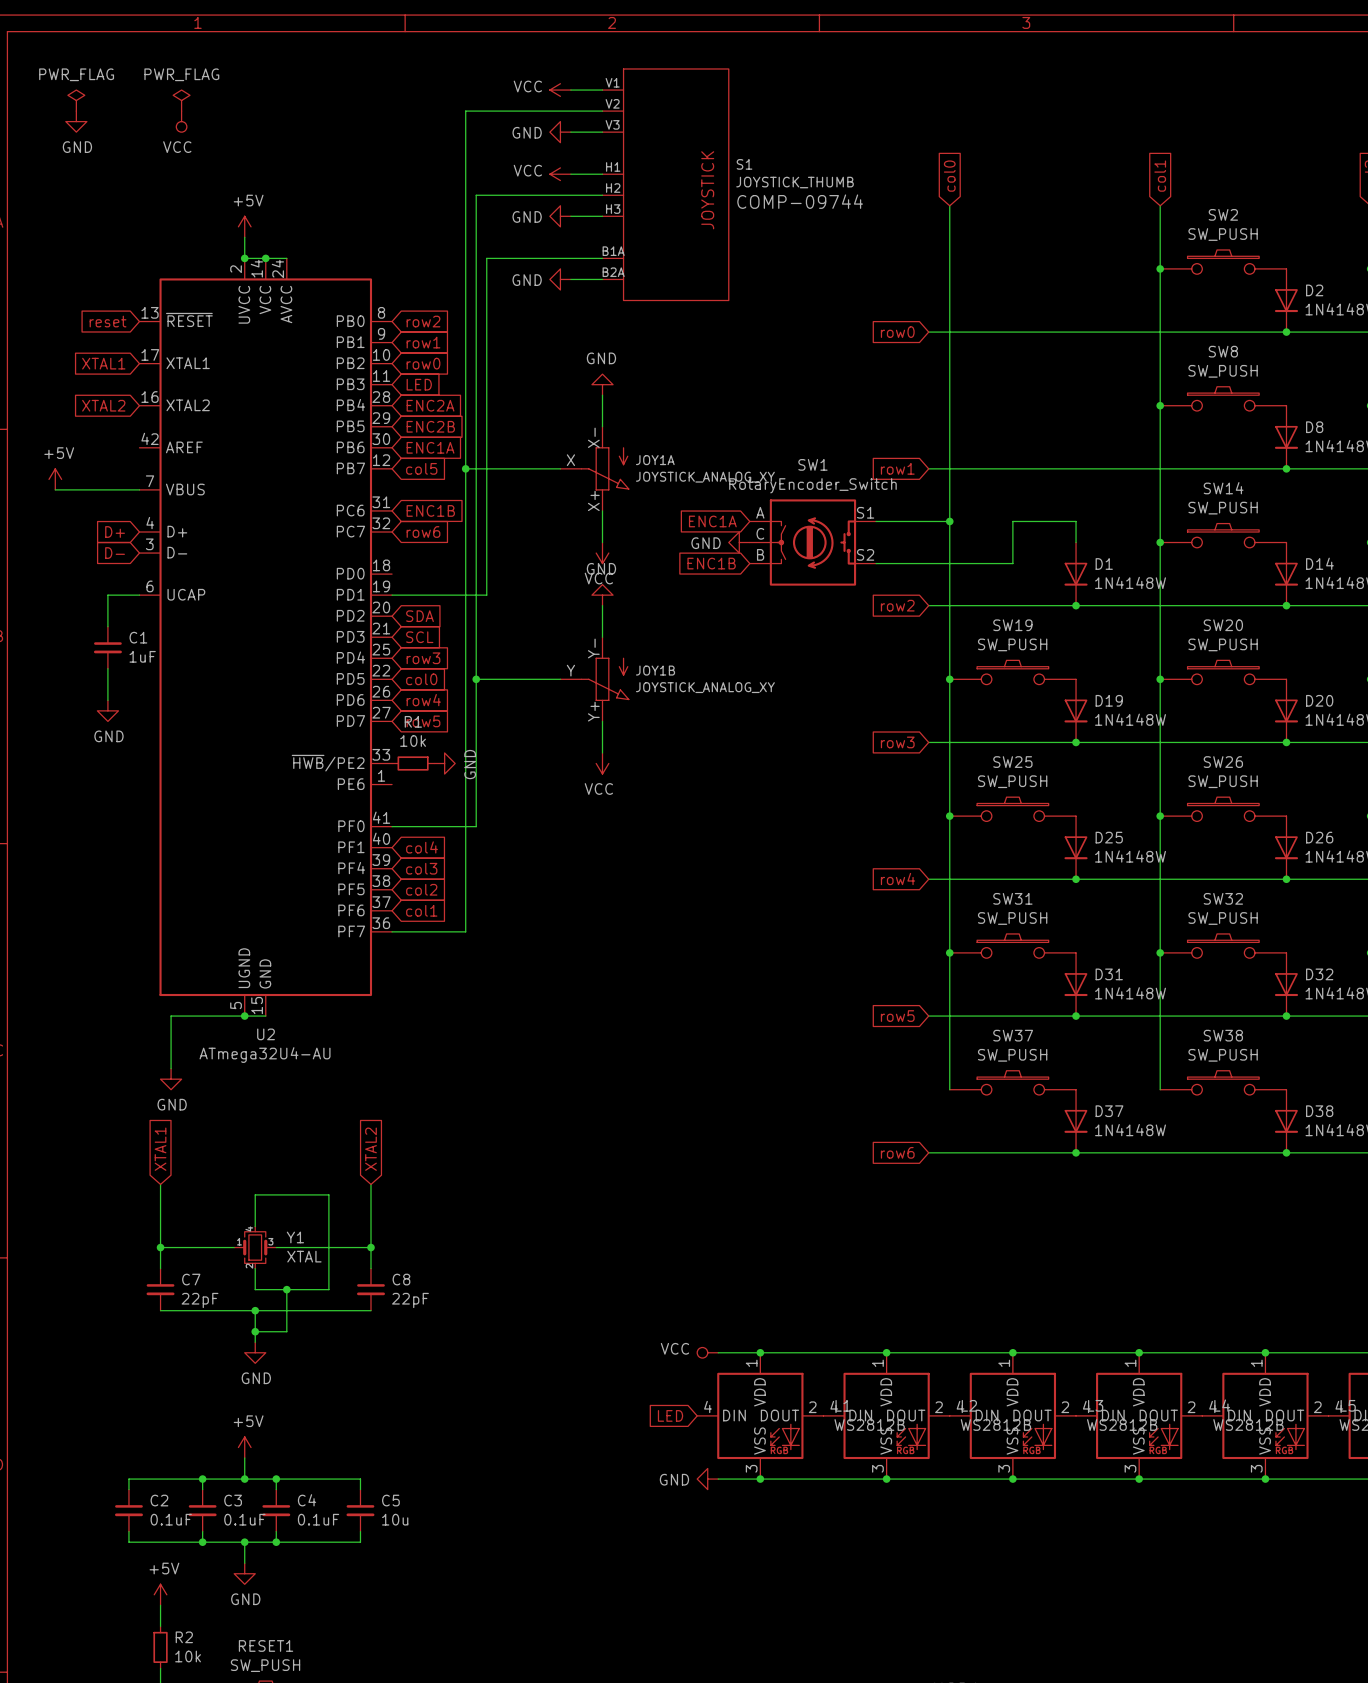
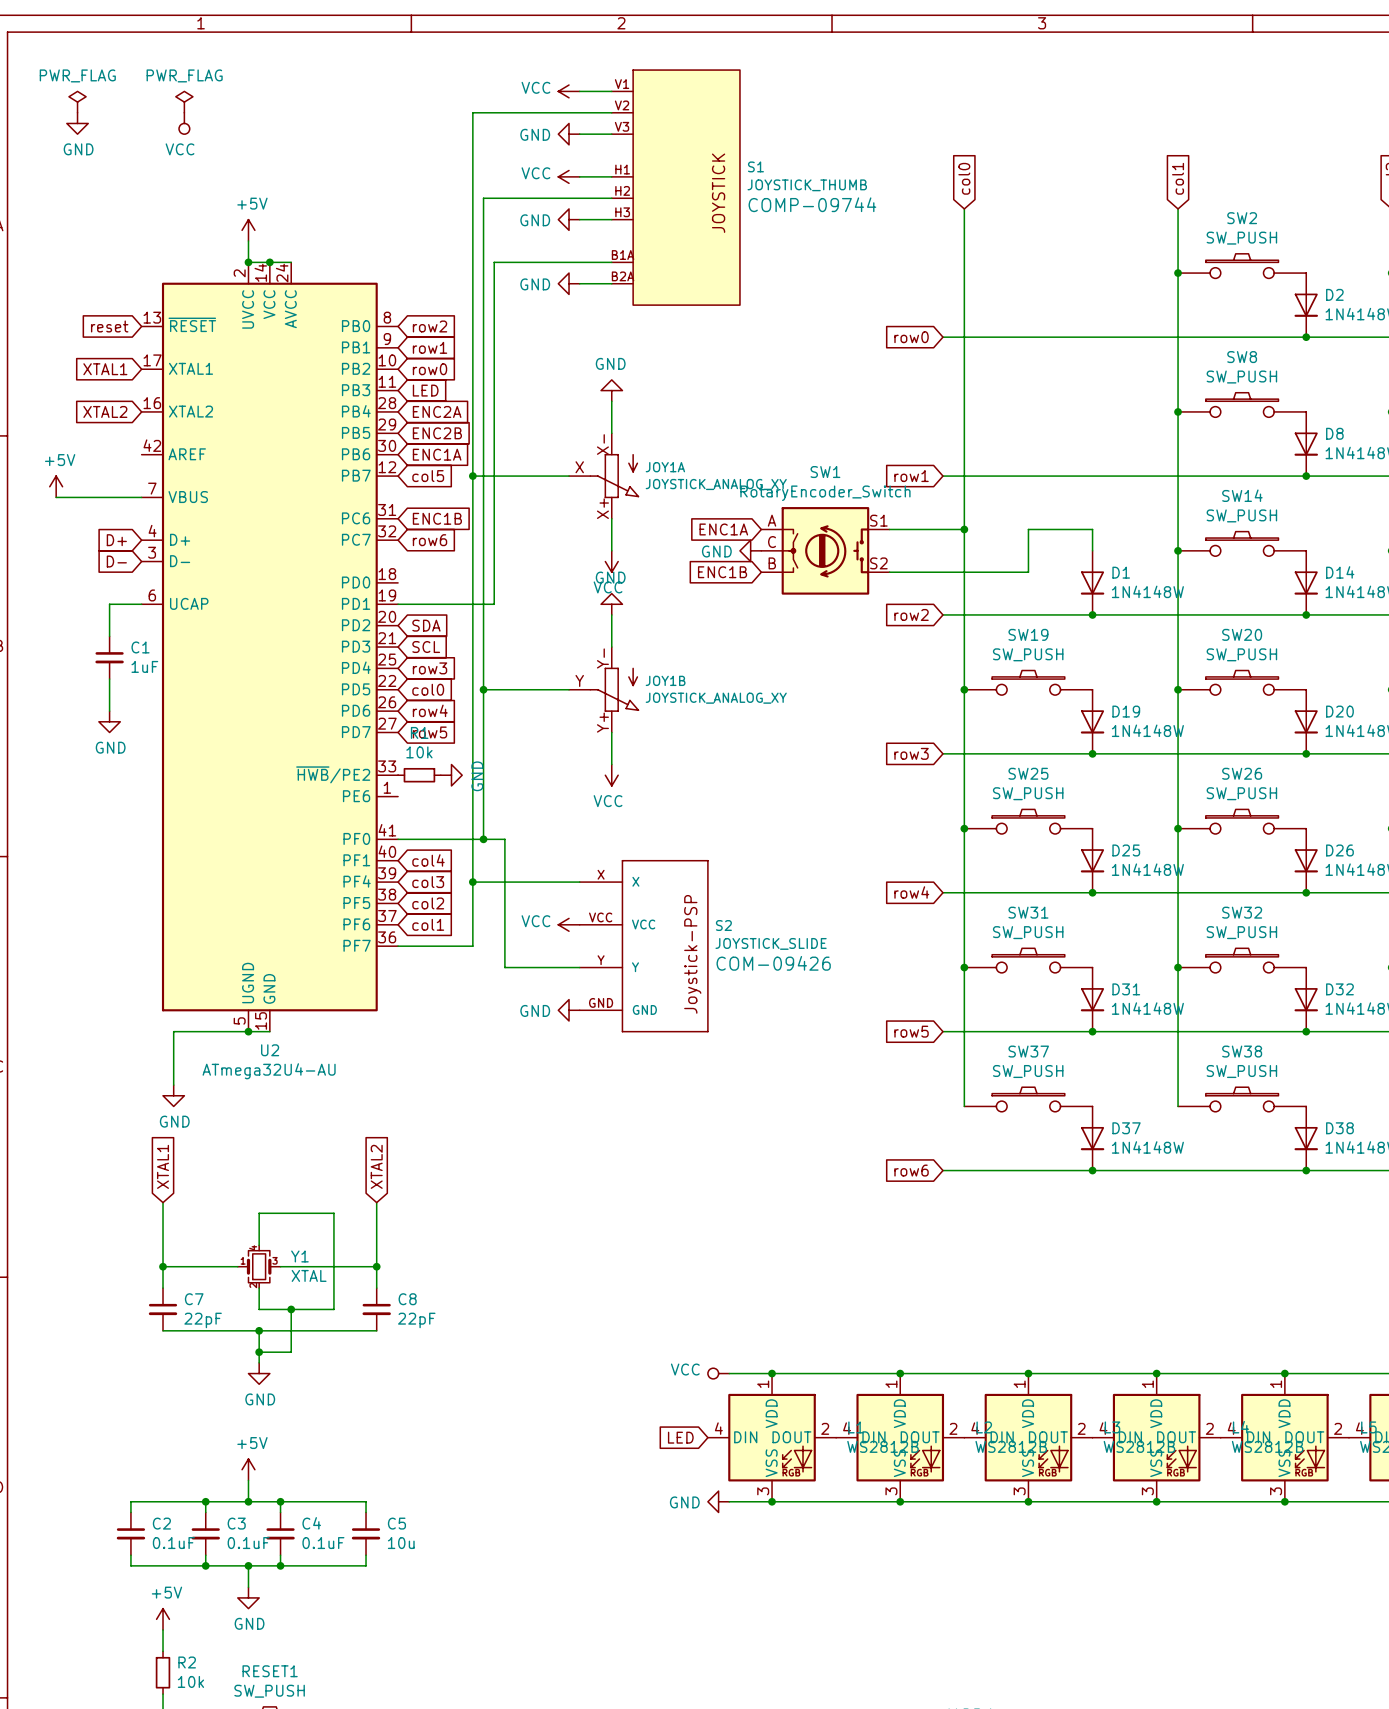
wire: none -> (483, 839) (504, 839) (504, 967) (579, 967)
junction: none -> (483, 839)
wire: none -> (472, 882) (579, 882)
junction: none -> (472, 882)
power symbol: none -> VCC (569, 924)
S2: none -> JOYSTICK_SLIDE (643, 946)
power symbol: none -> GND (569, 1010)

